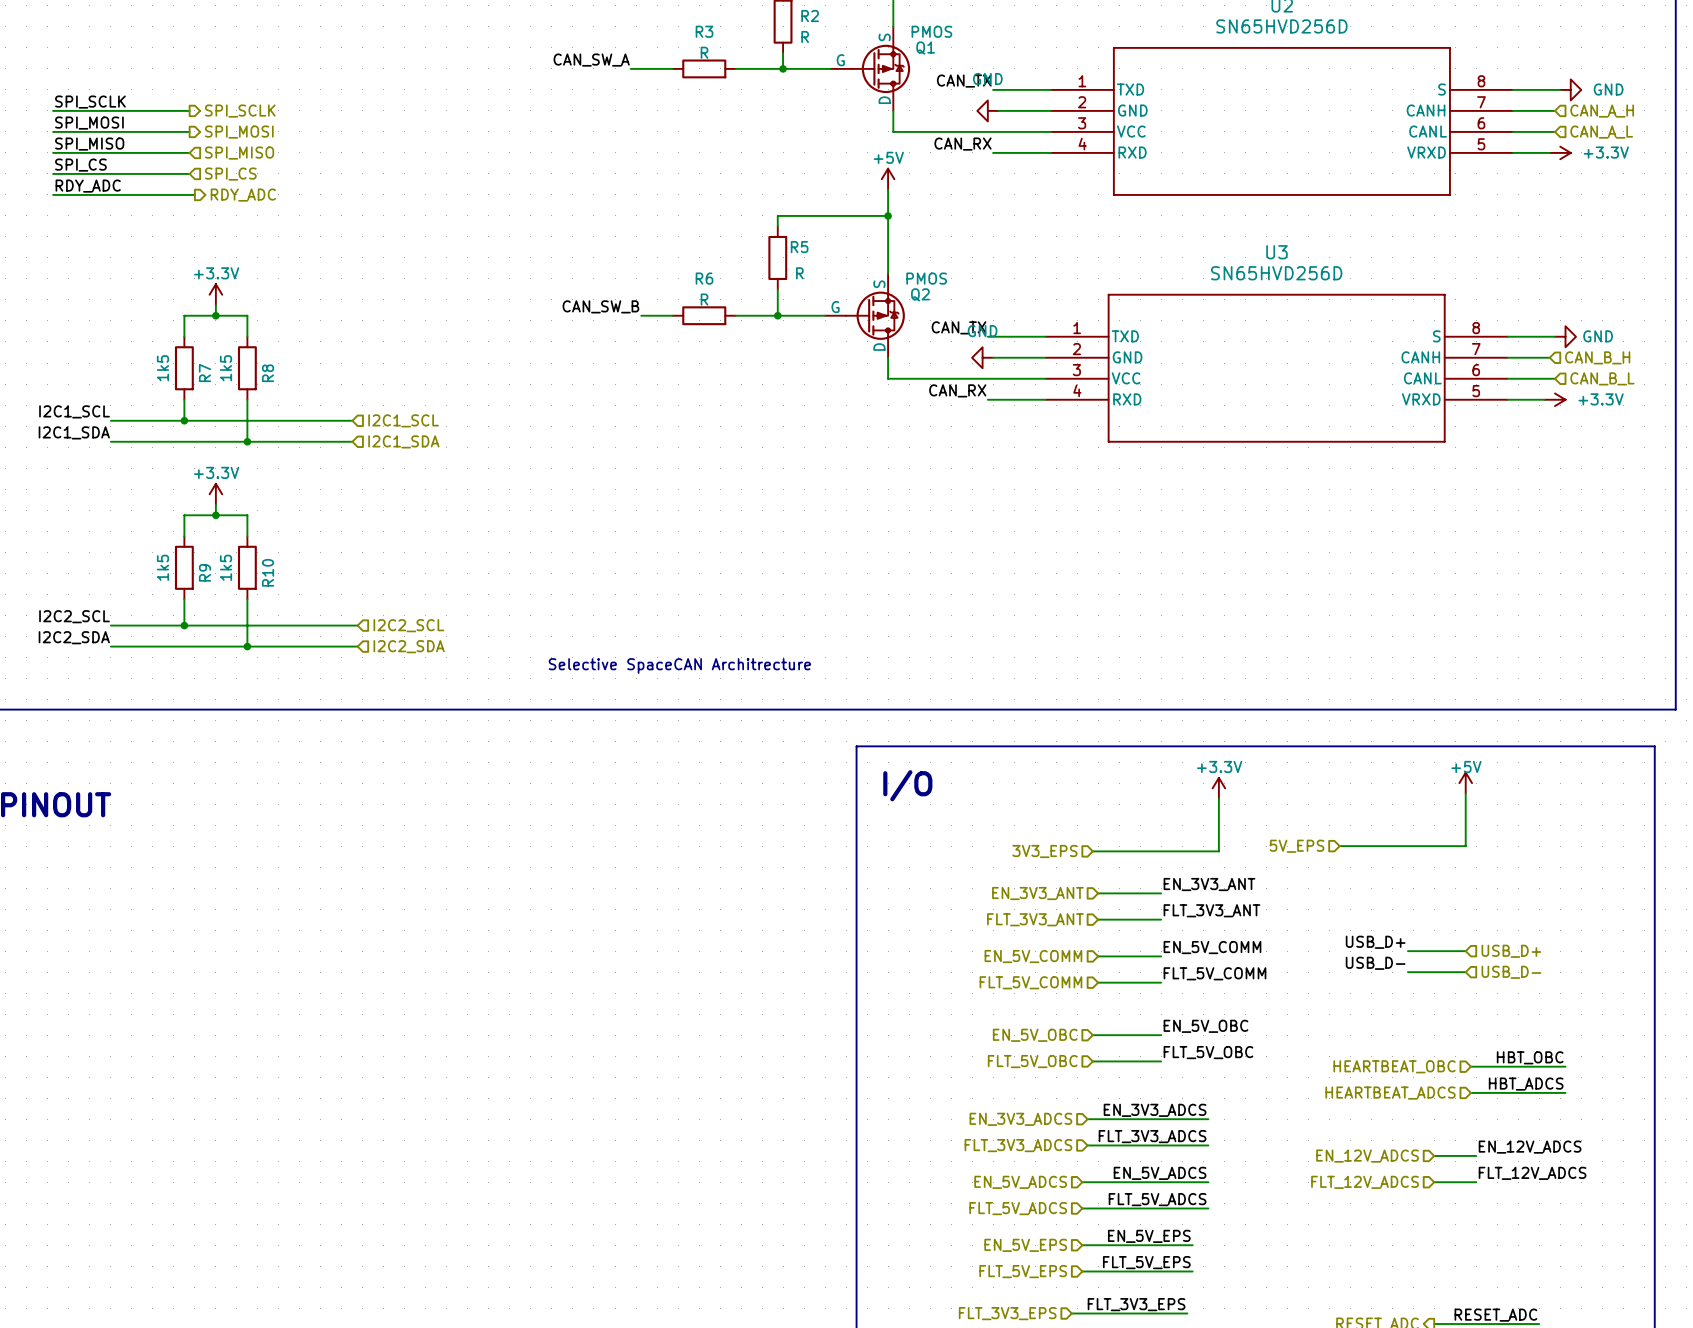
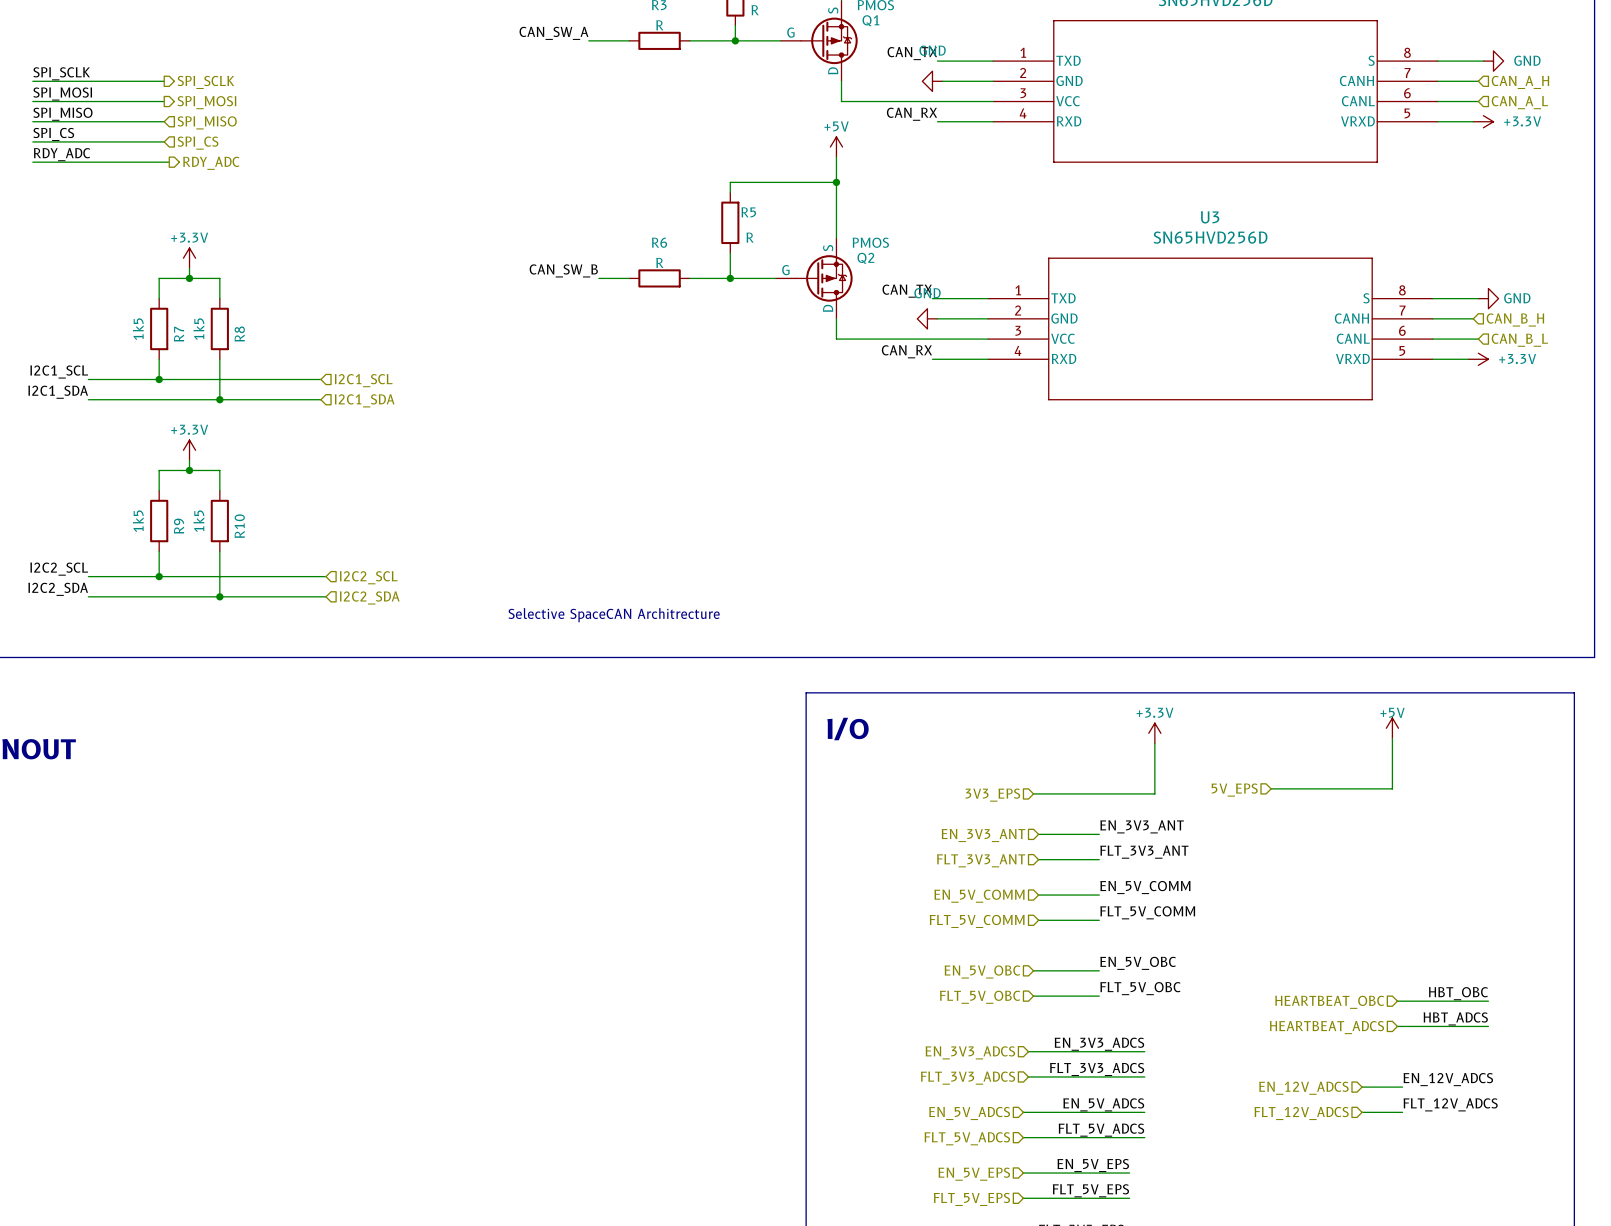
label: USB_D+ (1375, 942) -> none
wire: (1407, 951) (1465, 951) -> none
hierarchical label: USB_D+ (1511, 951) -> none
label: USB_D- (1375, 963) -> none
wire: (1407, 972) (1465, 972) -> none
hierarchical label: USB_D- (1511, 972) -> none

